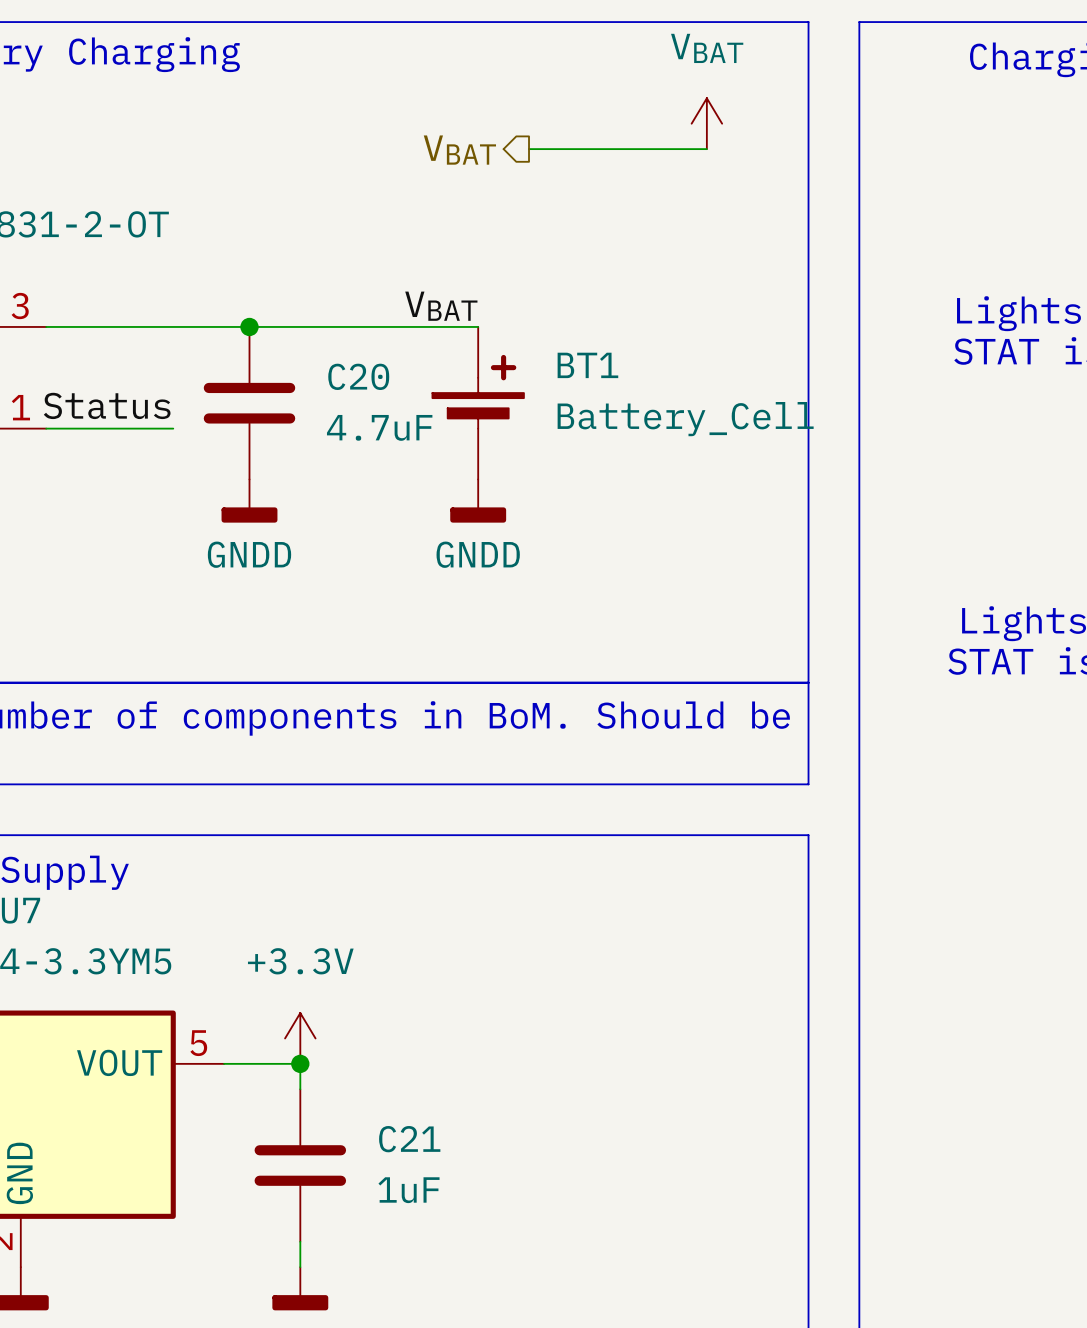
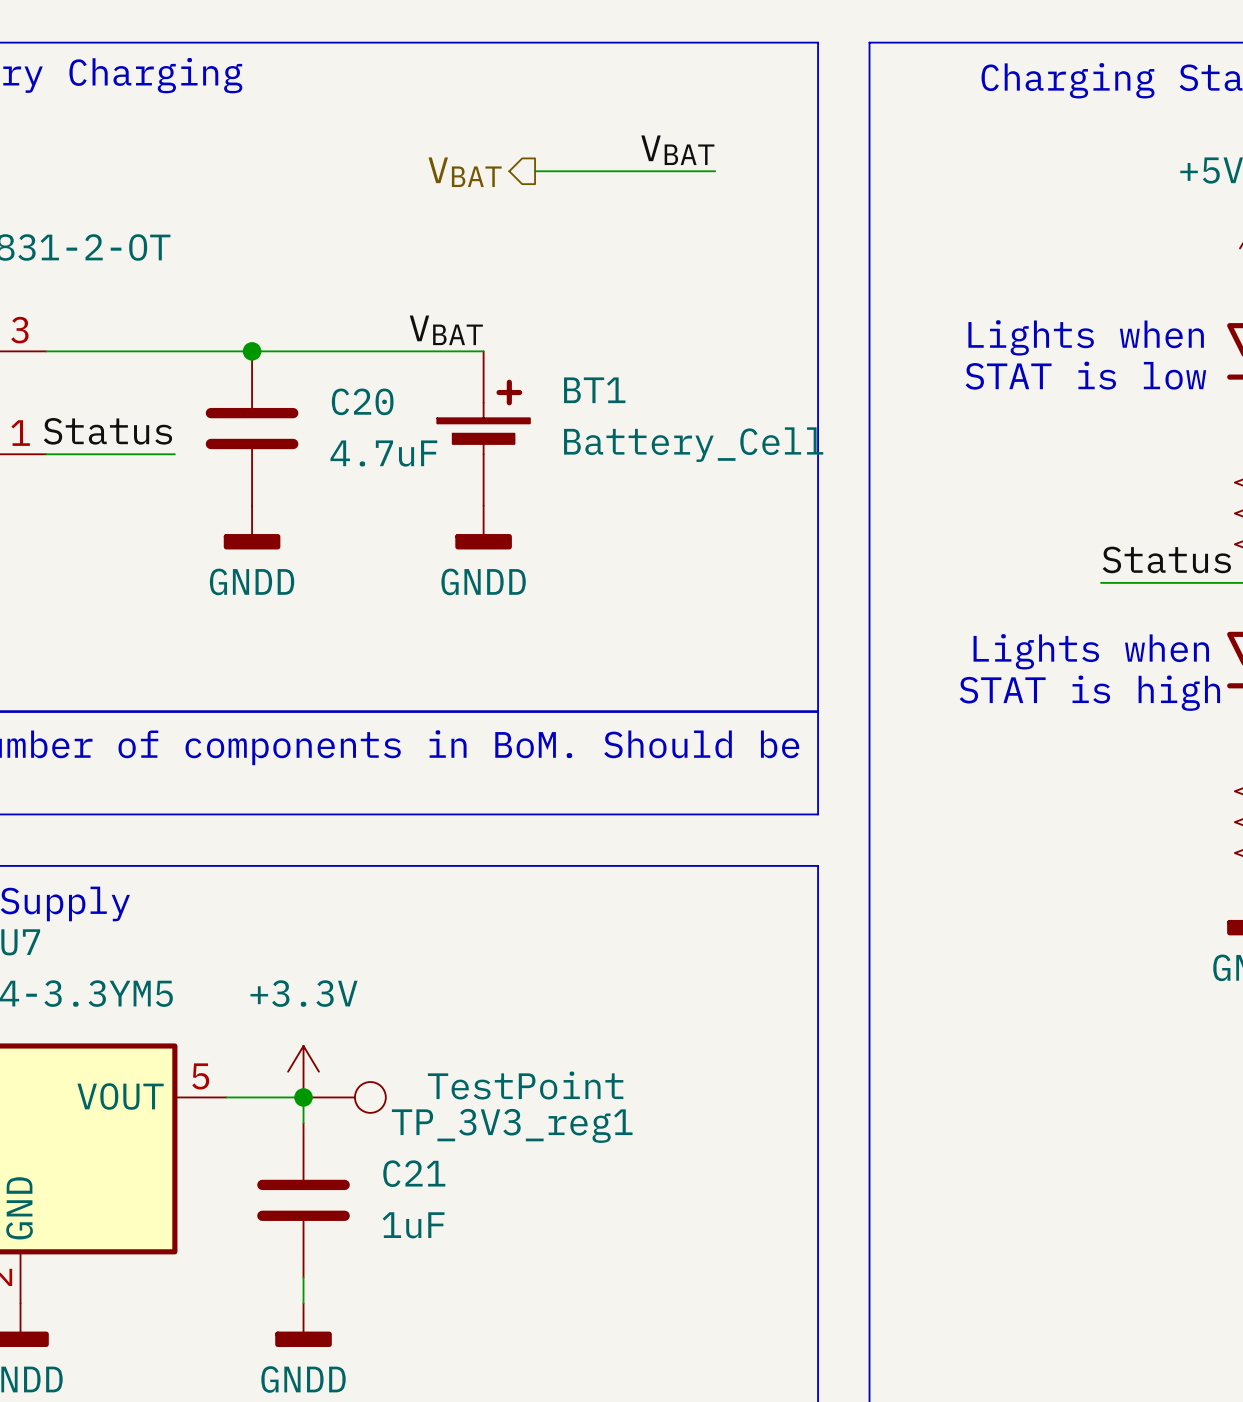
power symbol: VBAT (706, 123) -> none
label: none -> VBAT (677, 150)
TP_3V3_reg1: none -> TestPoint (344, 1097)

